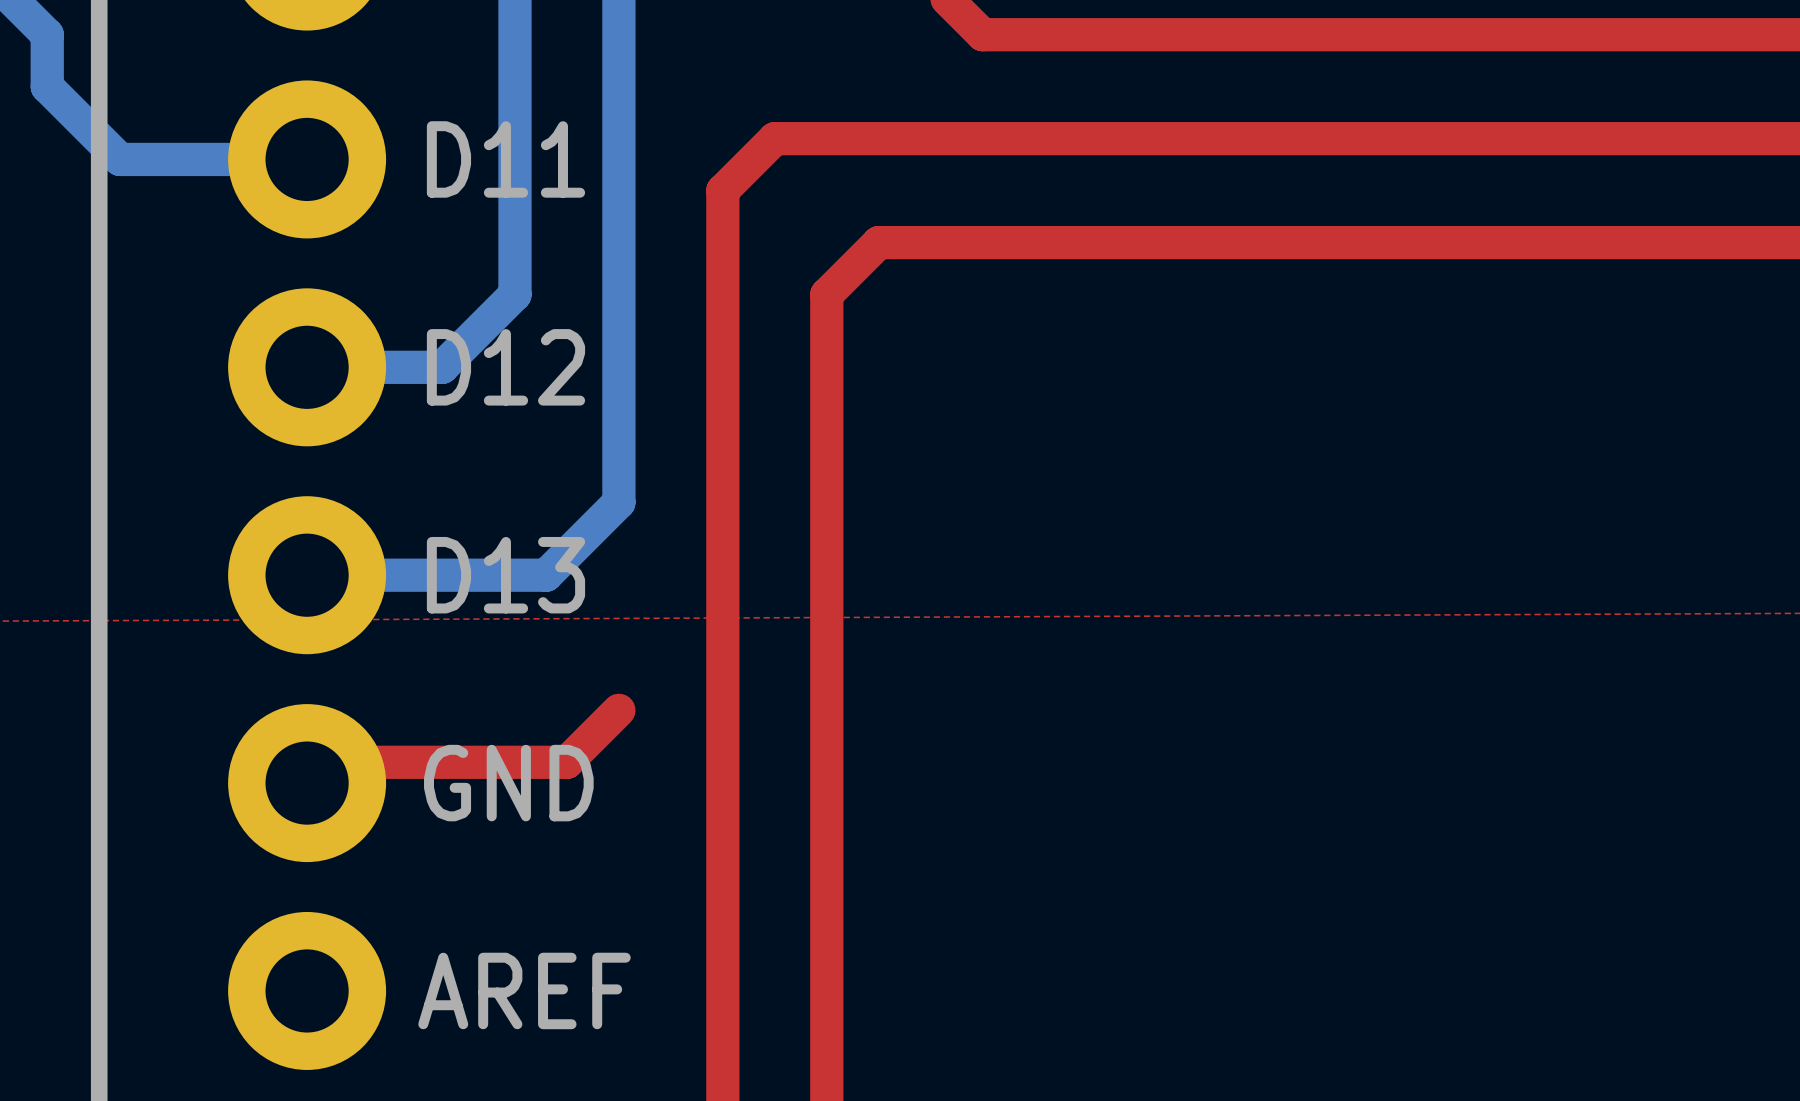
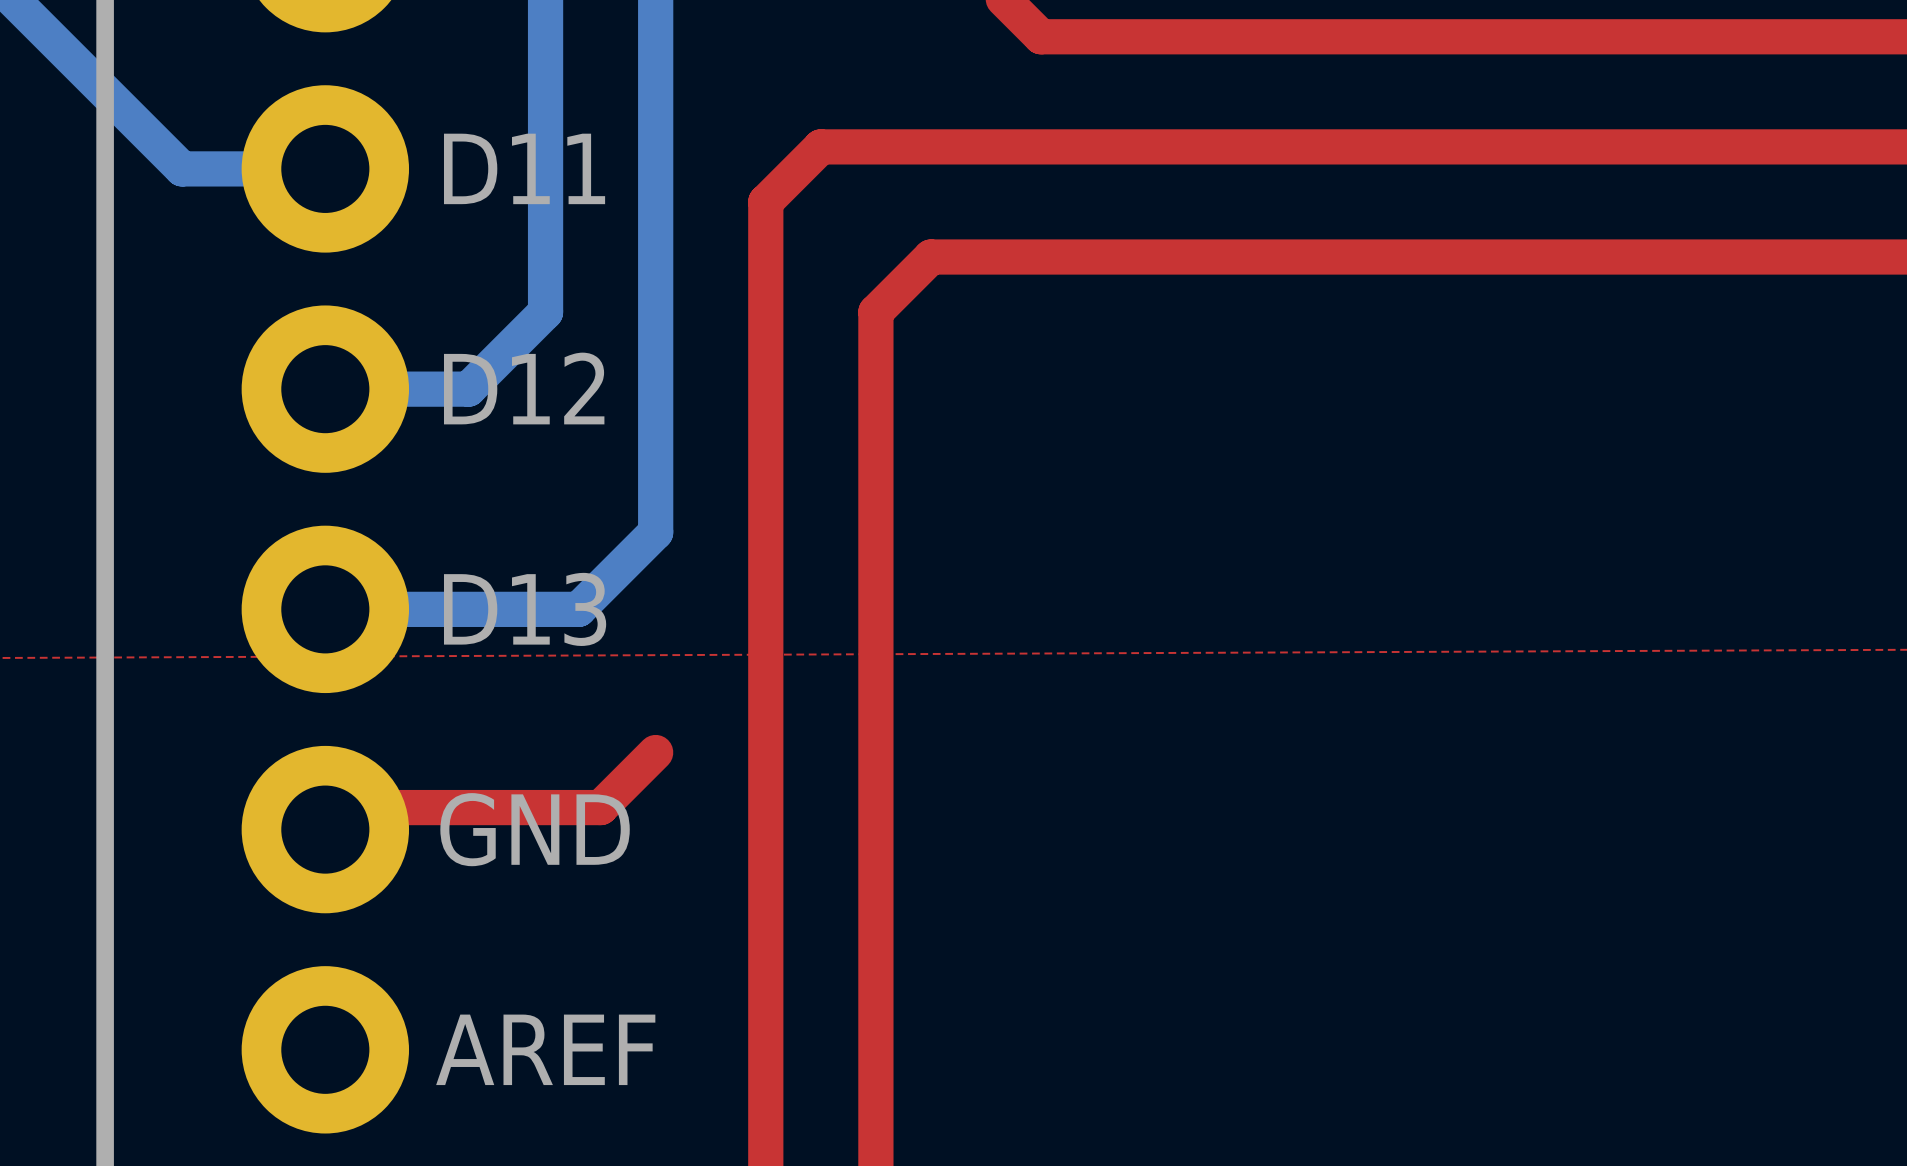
bottom track: (47, 34) (47, 86) (120, 159) (171, 159) -> (50, 36) (182, 168)

